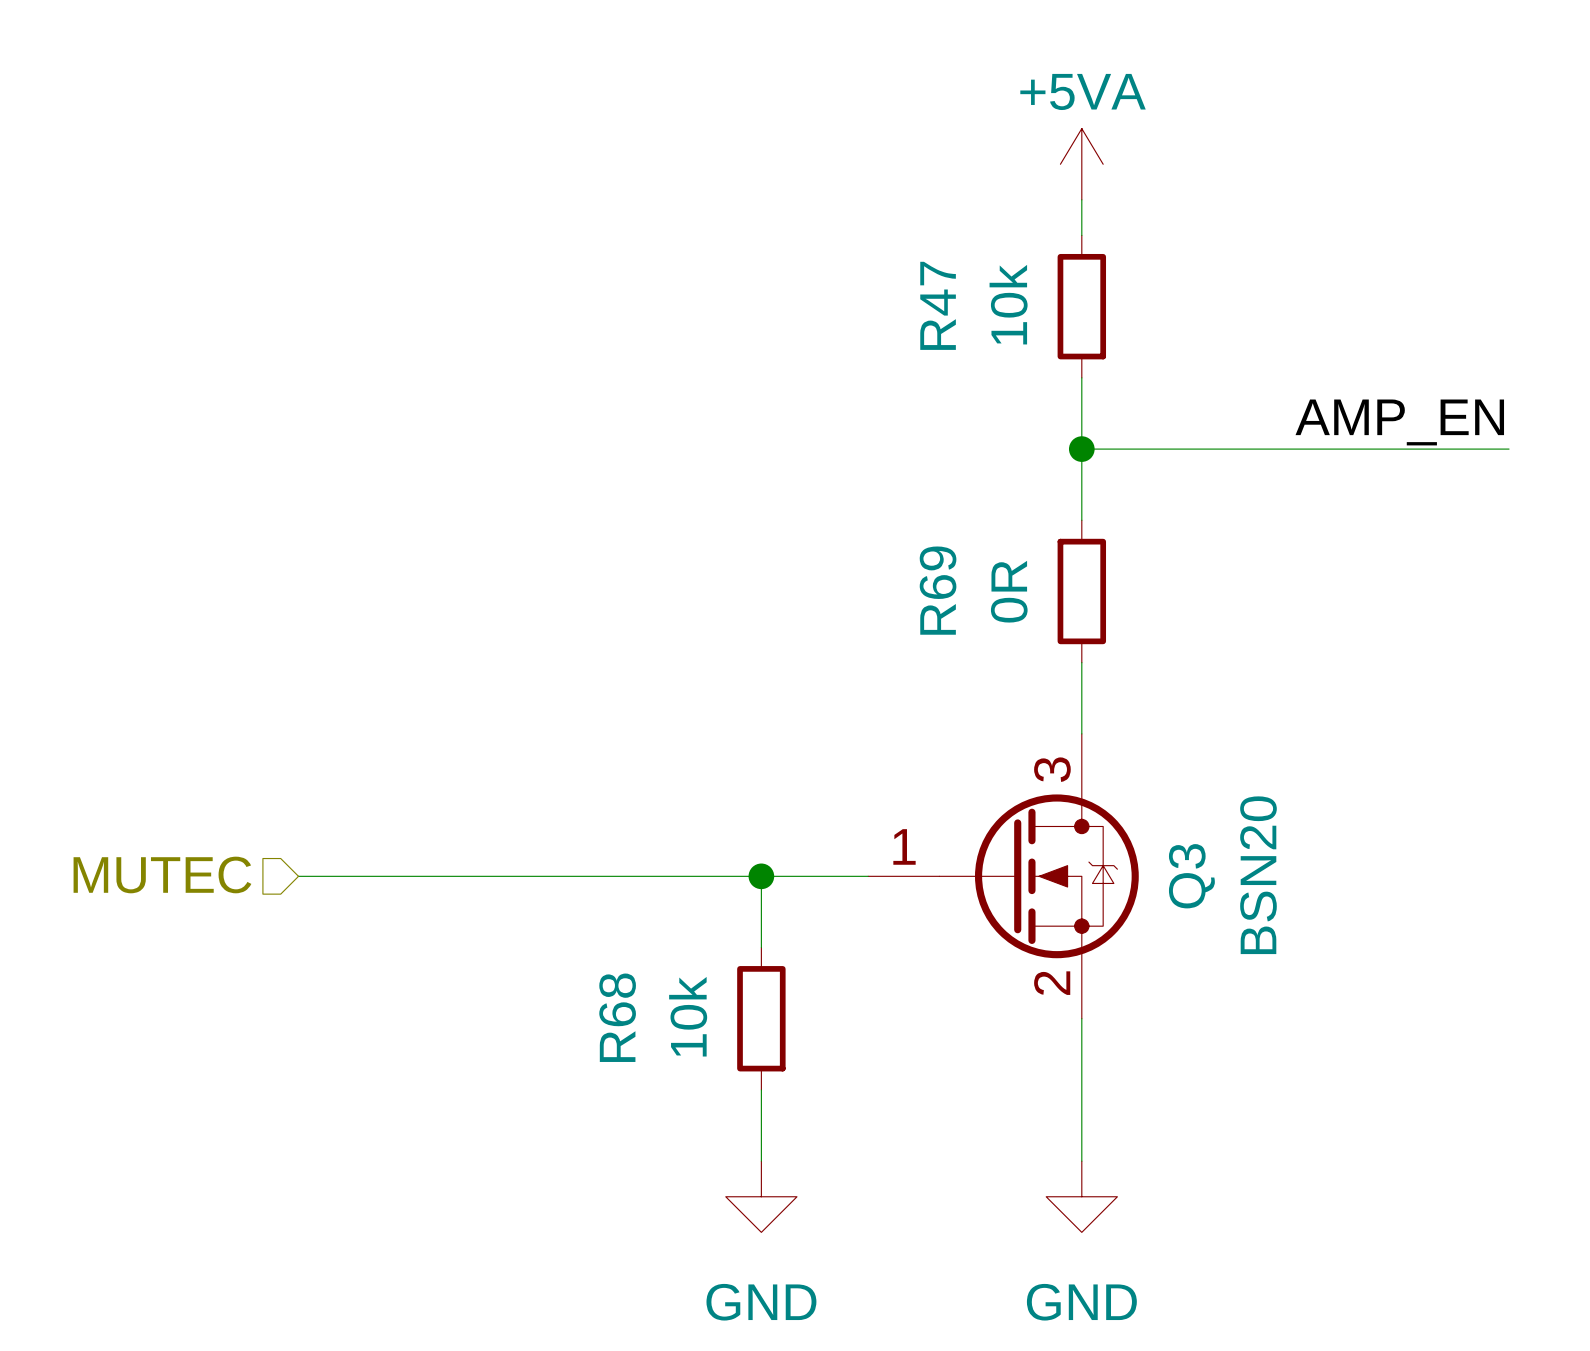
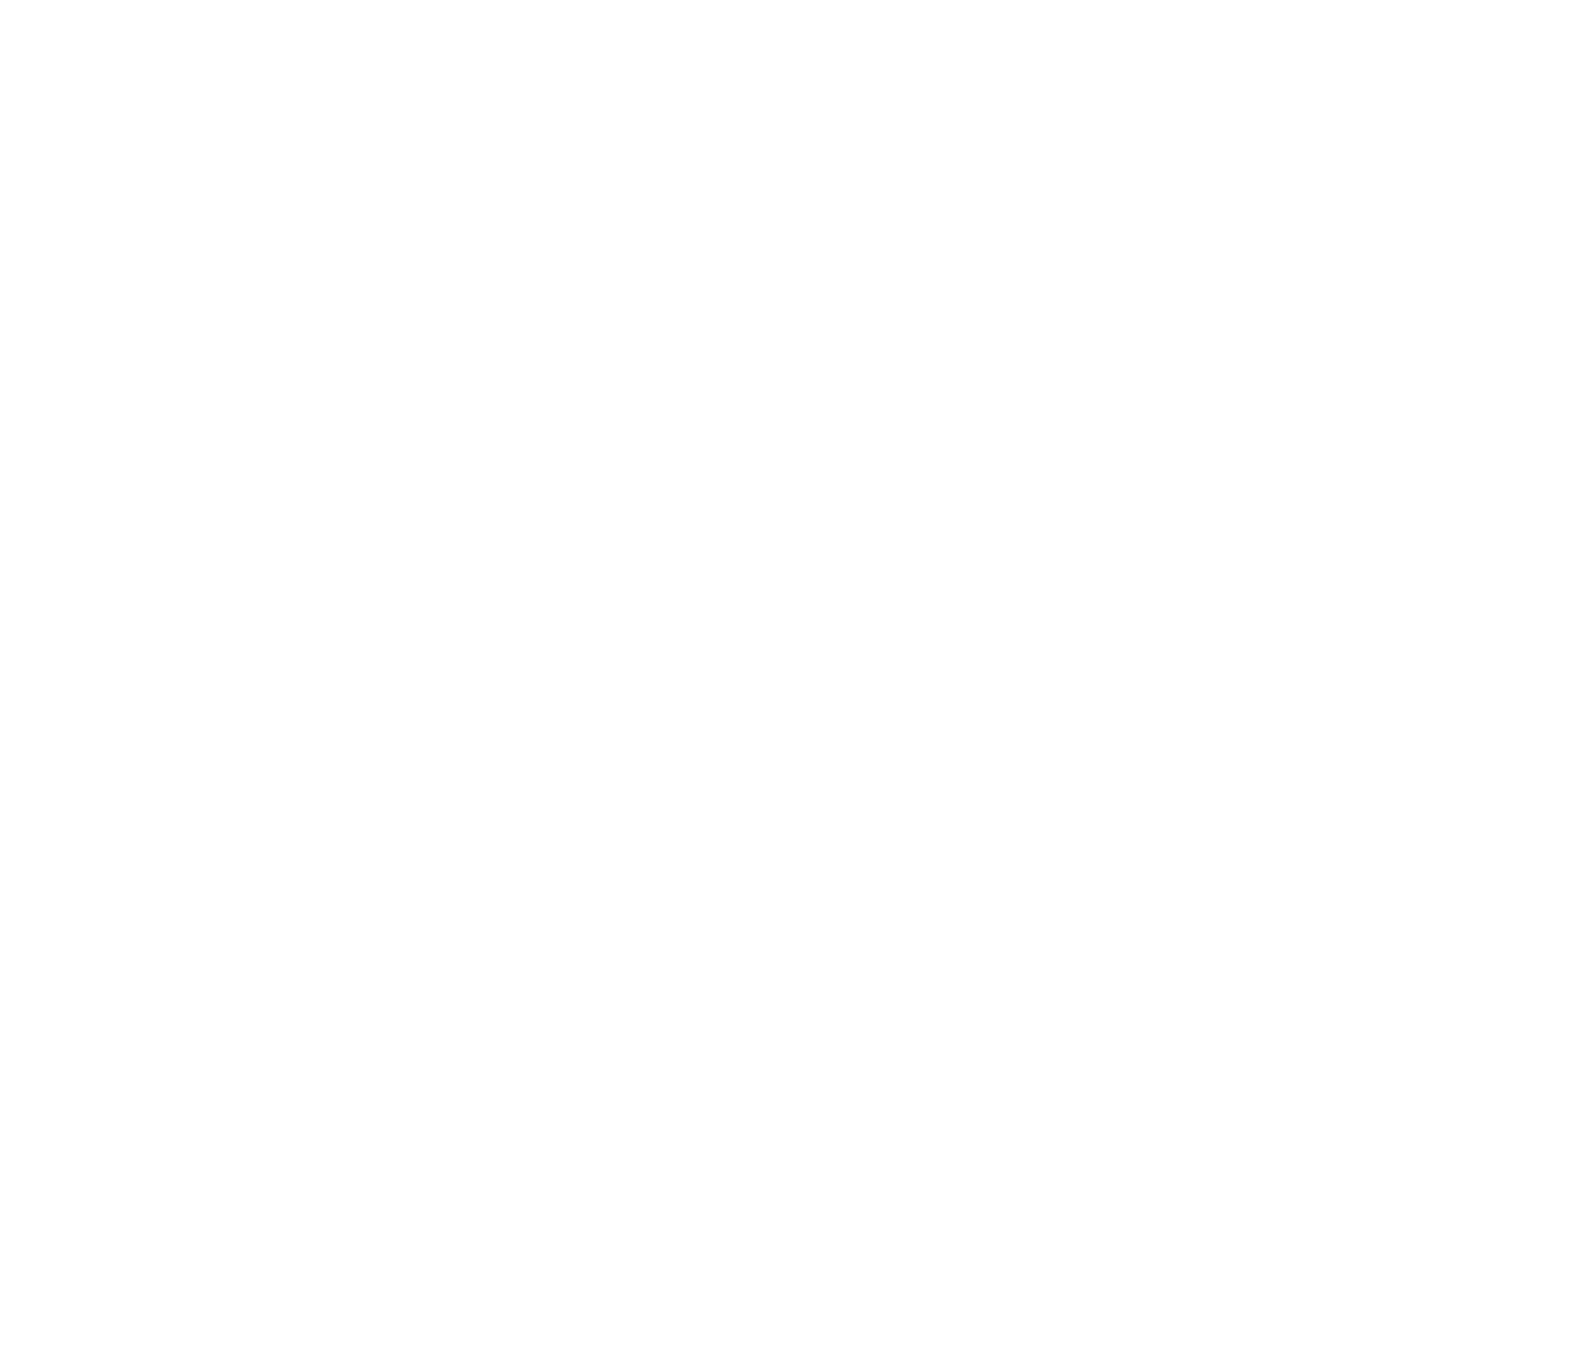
power symbol: +5VA (1081, 164) -> none
wire: (1081, 199) (1081, 235) -> none
R47: 10k (1081, 306) -> none
wire: (1081, 377) (1081, 520) -> none
label: AMP_EN (1399, 422) -> none
wire: (1081, 449) (1509, 449) -> none
junction: (1081, 449) -> none
R69: 0R (1081, 591) -> none
wire: (1081, 662) (1081, 733) -> none
hierarchical label: MUTEC (162, 874) -> none
wire: (298, 876) (868, 876) -> none
wire: (761, 876) (761, 947) -> none
junction: (761, 876) -> none
Q3: BSN20 (1003, 876) -> none
R68: 10k (761, 1018) -> none
wire: (1081, 1018) (1081, 1161) -> none
wire: (761, 1089) (761, 1161) -> none
power symbol: GND (761, 1196) -> none
power symbol: GND (1081, 1196) -> none

